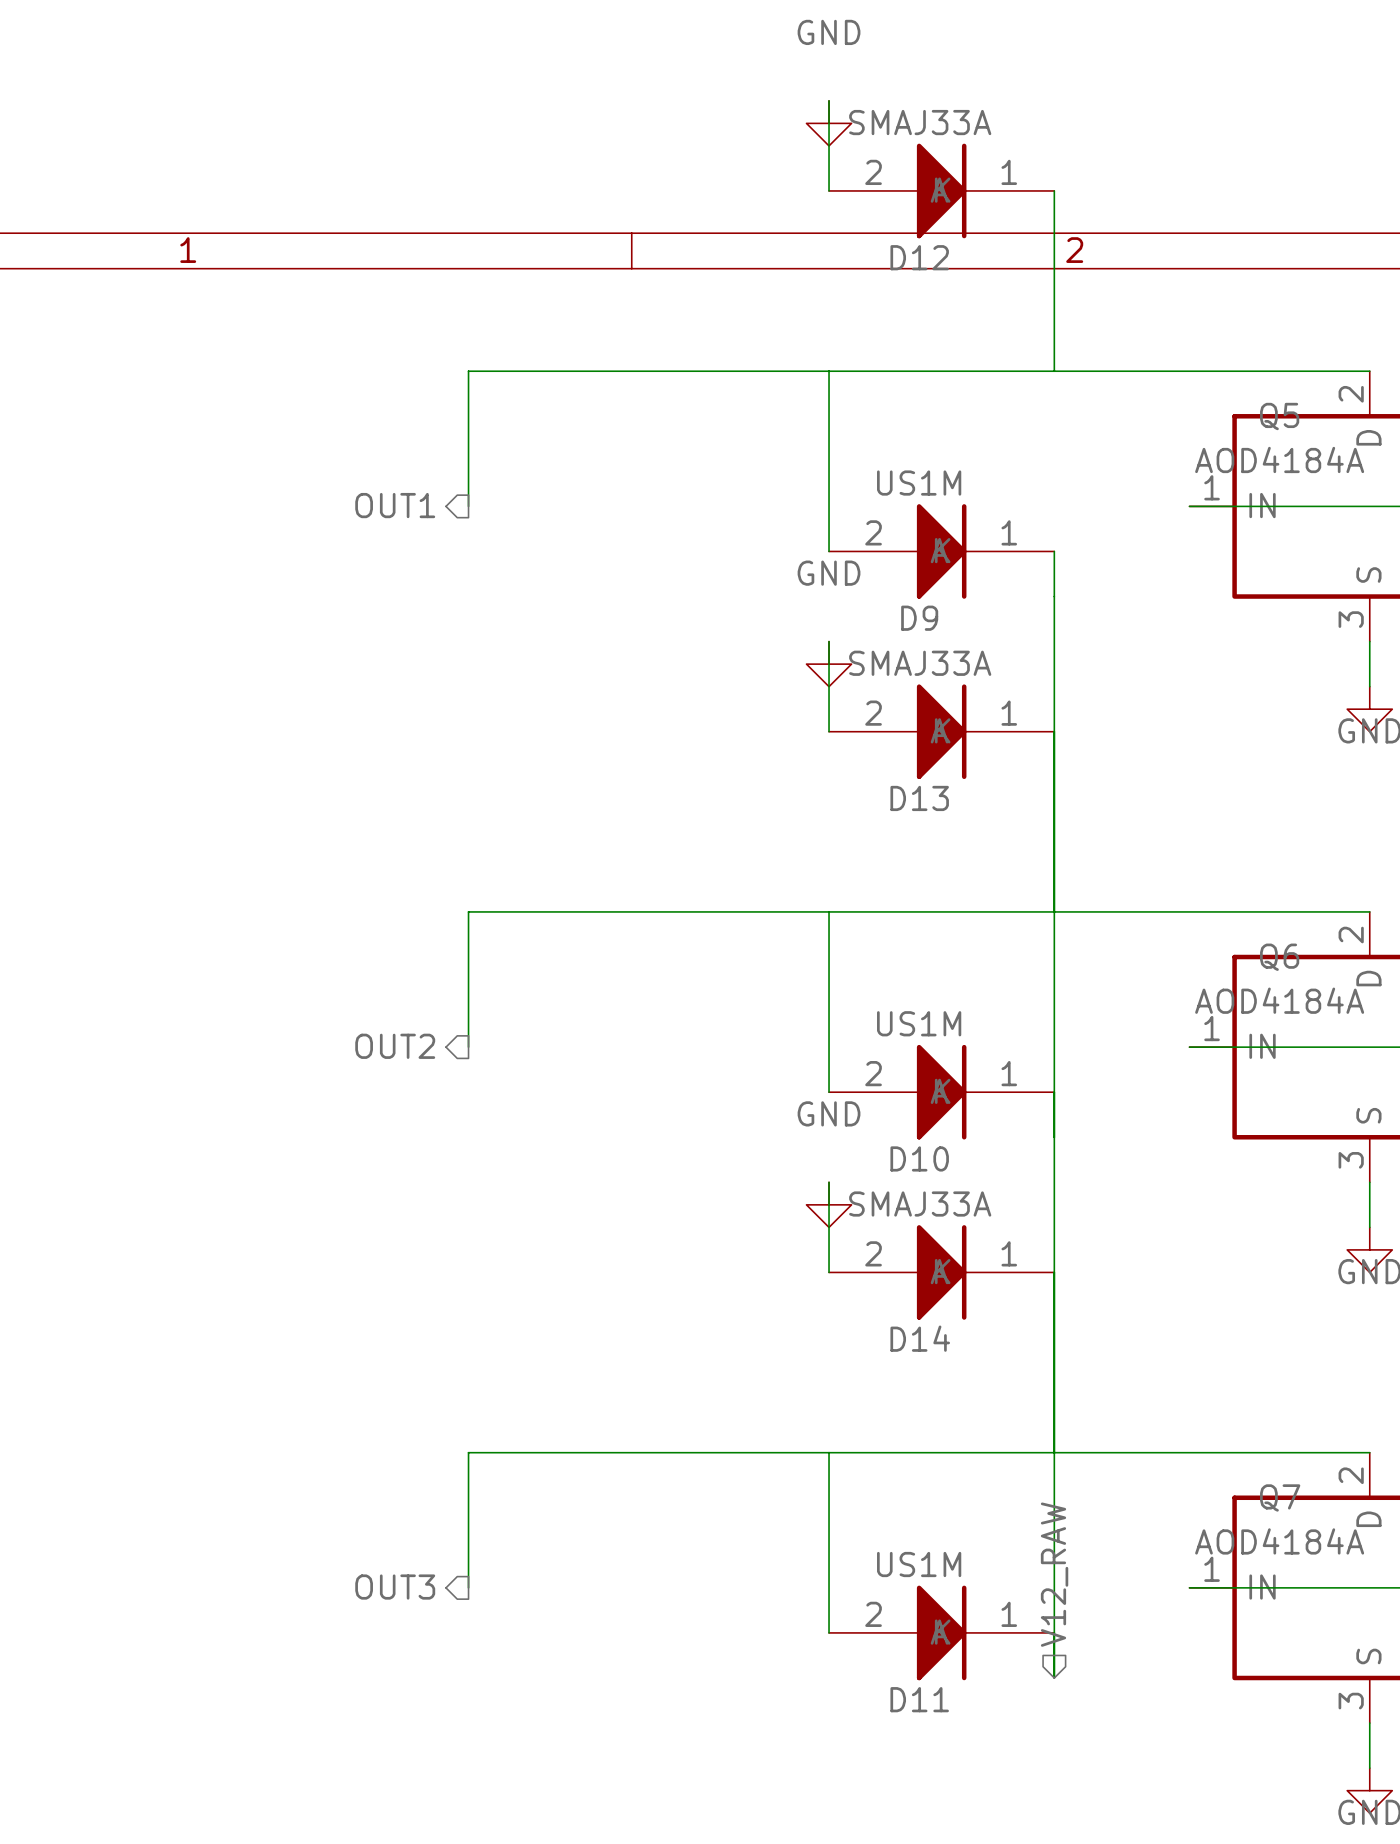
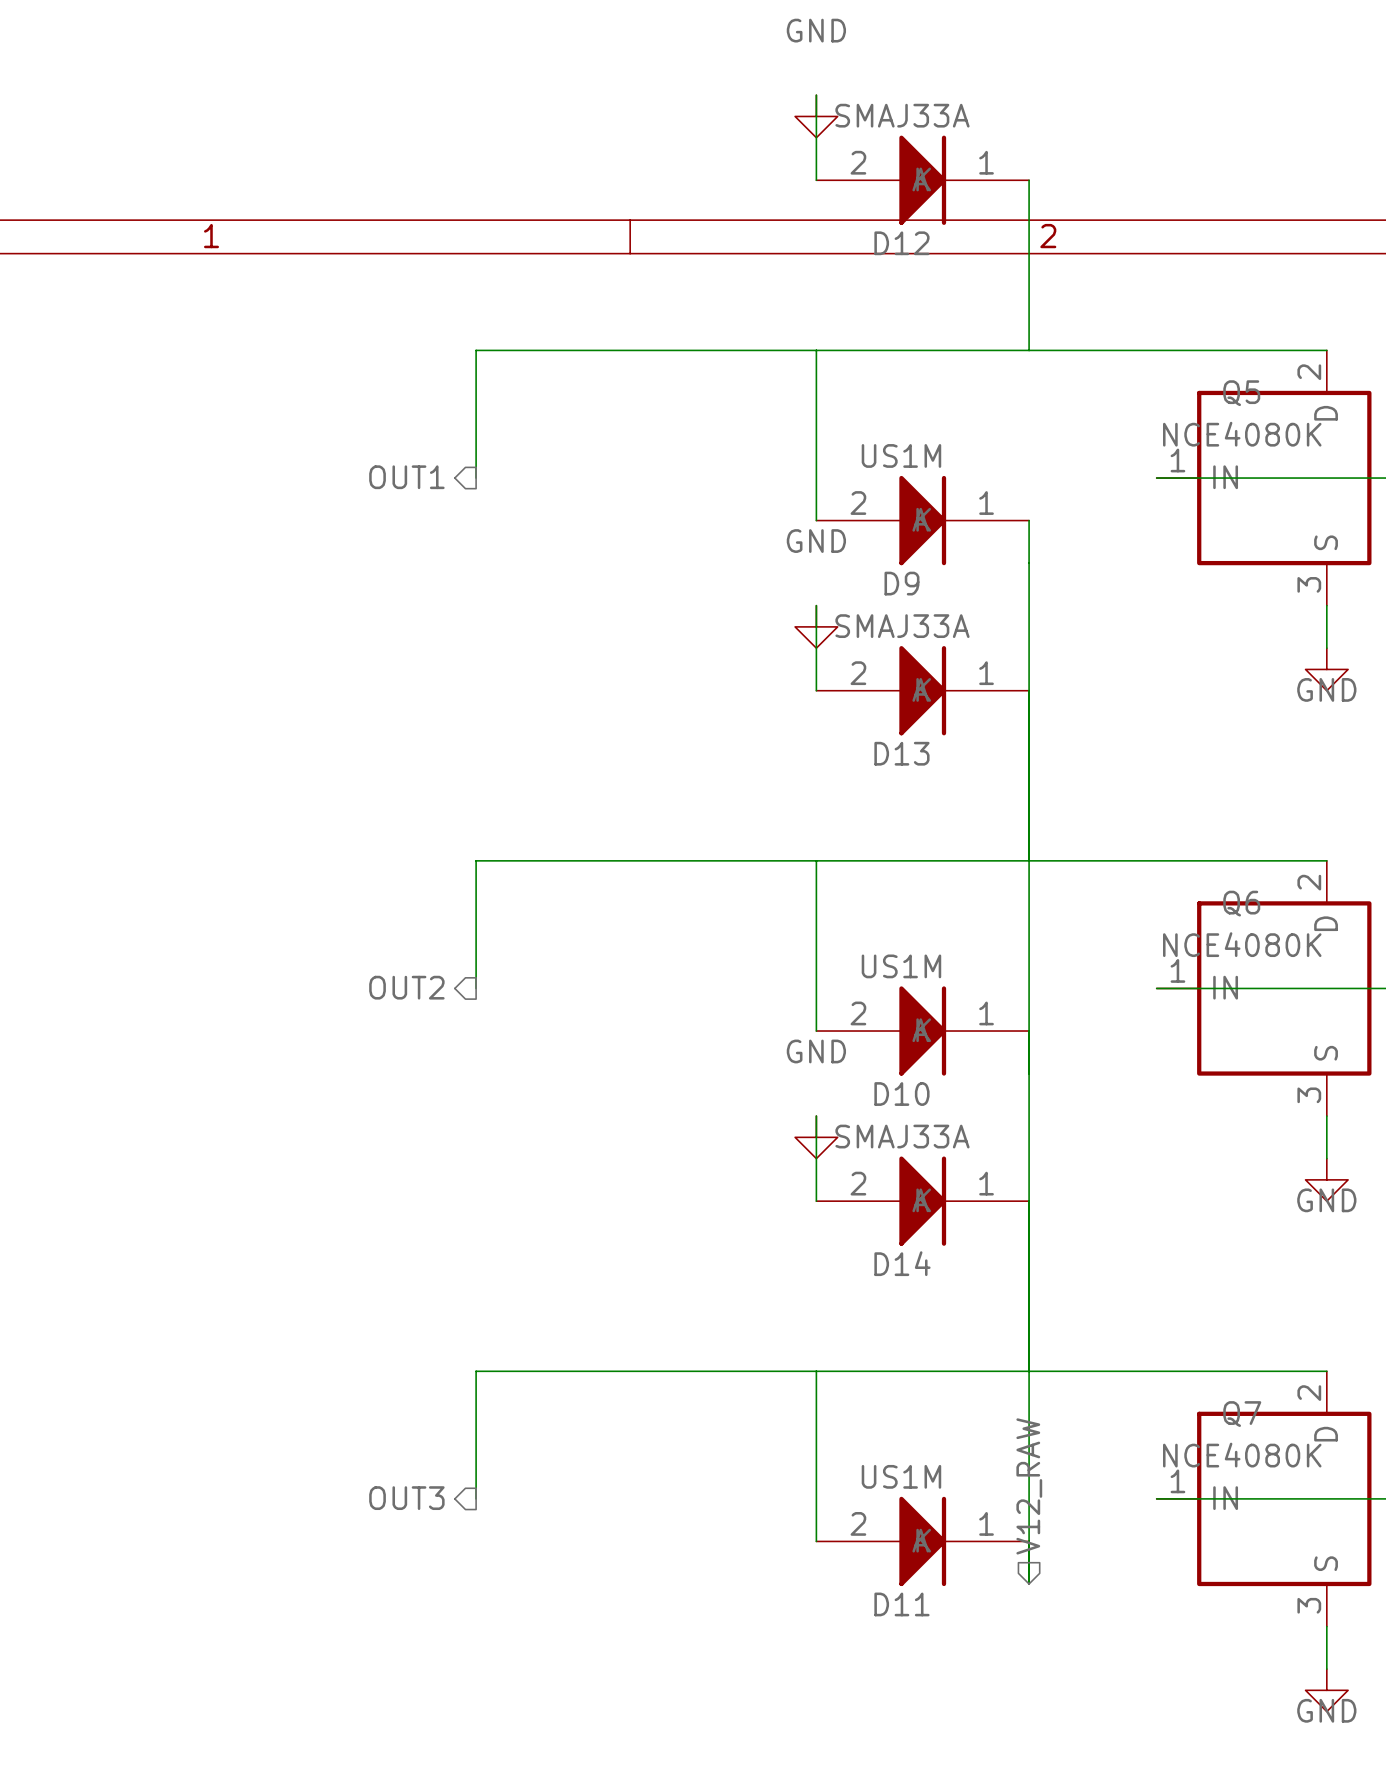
Q5 value: AOD4184A (1279, 459) -> NCE4080K (1242, 434)
Q6 value: AOD4184A (1279, 1000) -> NCE4080K (1242, 944)
Q7 value: AOD4184A (1279, 1541) -> NCE4080K (1242, 1455)

